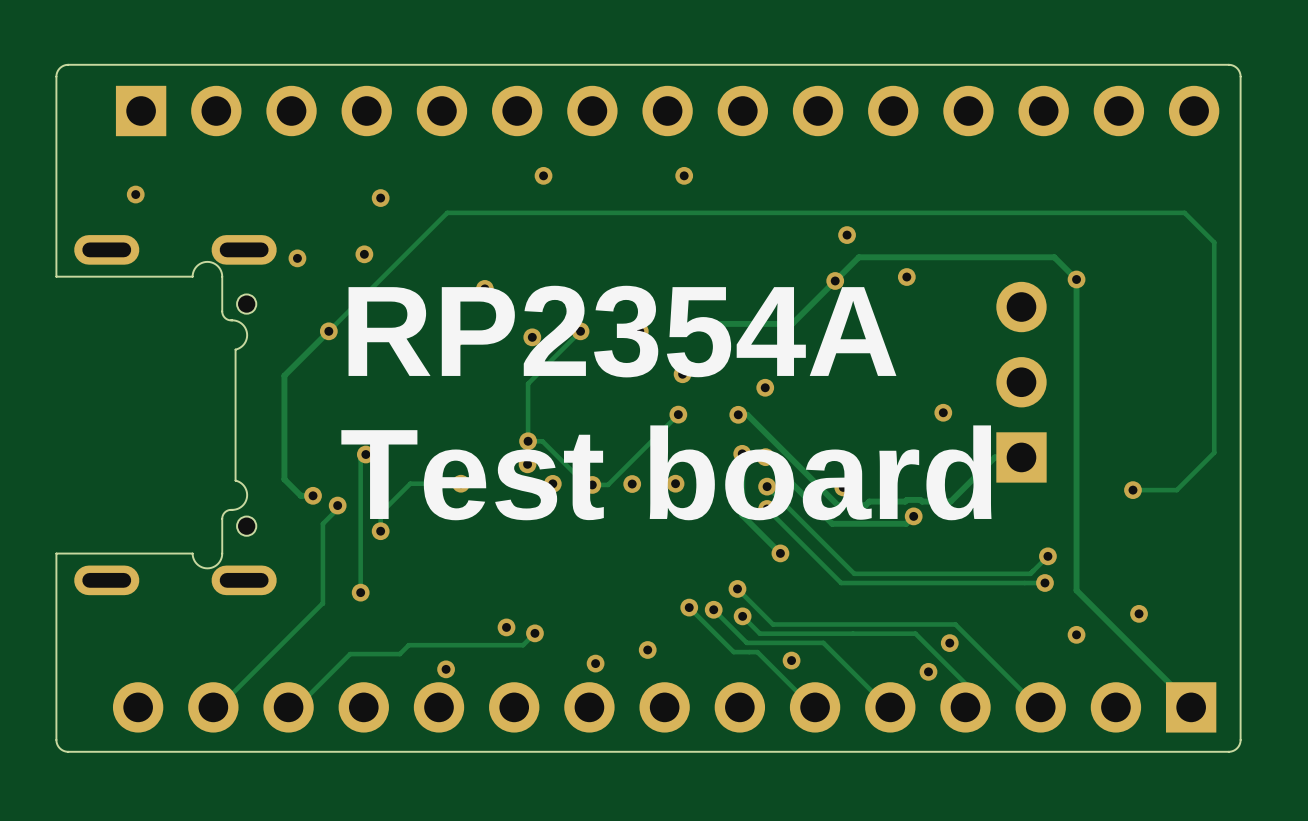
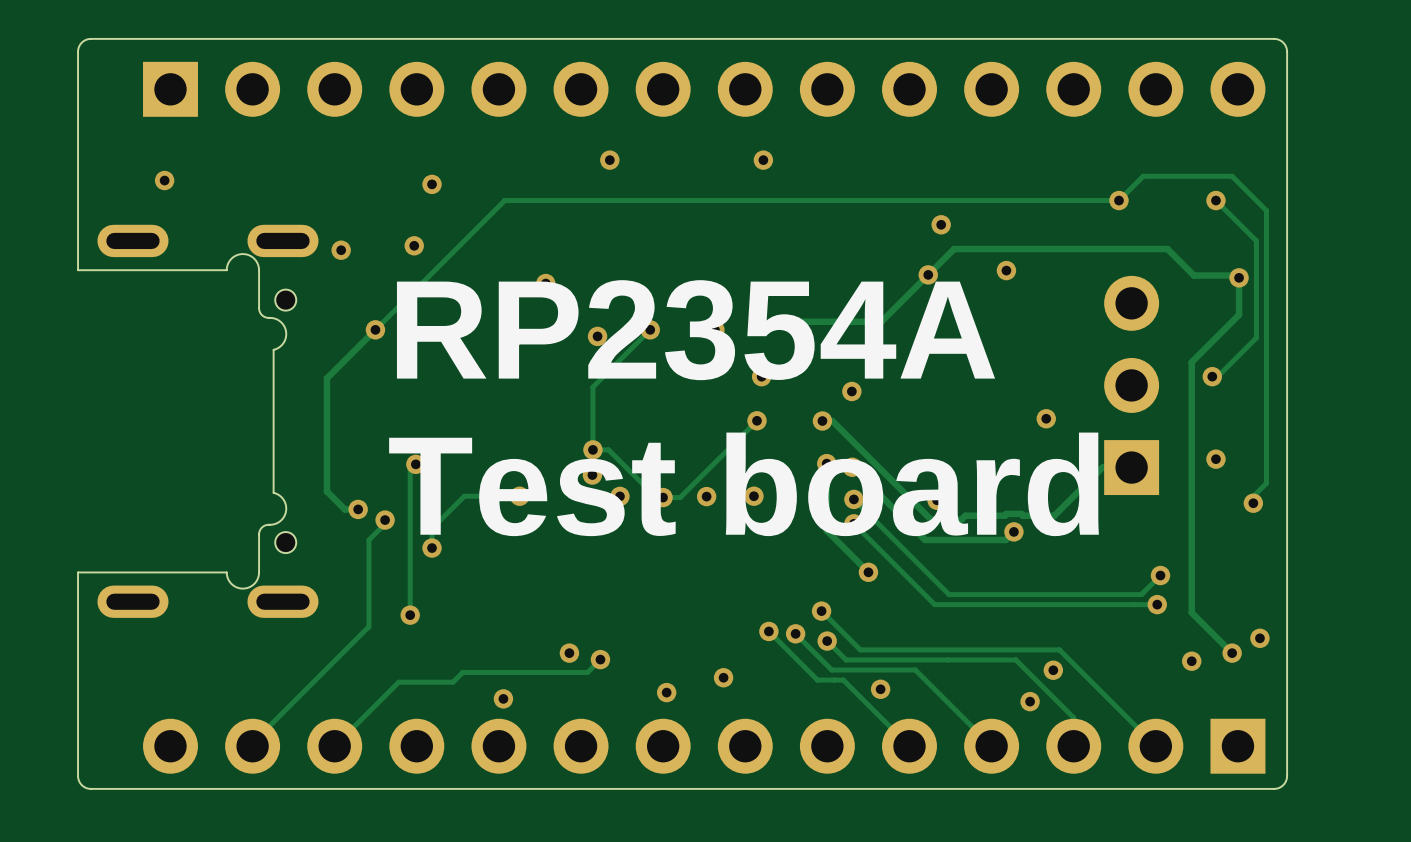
board edge: (1152, 64) (1230, 64) (1237, 68) (1240, 76) (1240, 741) (1237, 748) (1230, 751) (1152, 751) -> (1274, 38) (1283, 42) (1287, 51) (1287, 775) (1283, 785) (1274, 788)
part: (667, 111) -> none
track: (1009, 212) (1184, 212) (1214, 242) (1214, 452) (1176, 490) (1132, 490) -> (1118, 200) (1143, 176) (1232, 176) (1266, 210) (1266, 483) (1253, 496) (1253, 503)
via: none -> (1118, 200)
track: none -> (1215, 200) (1256, 240) (1256, 337) (1217, 376) (1212, 376)
via: none -> (1215, 200)
track: (1076, 279) (1076, 360) -> (1193, 275) (1236, 275) (1239, 277) (1239, 314) (1191, 362)
via: (1076, 279) -> none
via: none -> (1239, 277)
via: none -> (1212, 376)
via: none -> (1215, 459)
track: (1113, 627) (1191, 705) (1191, 712) -> none
via: none -> (1232, 653)
part: (664, 707) -> none
part: none -> (704, 746)

